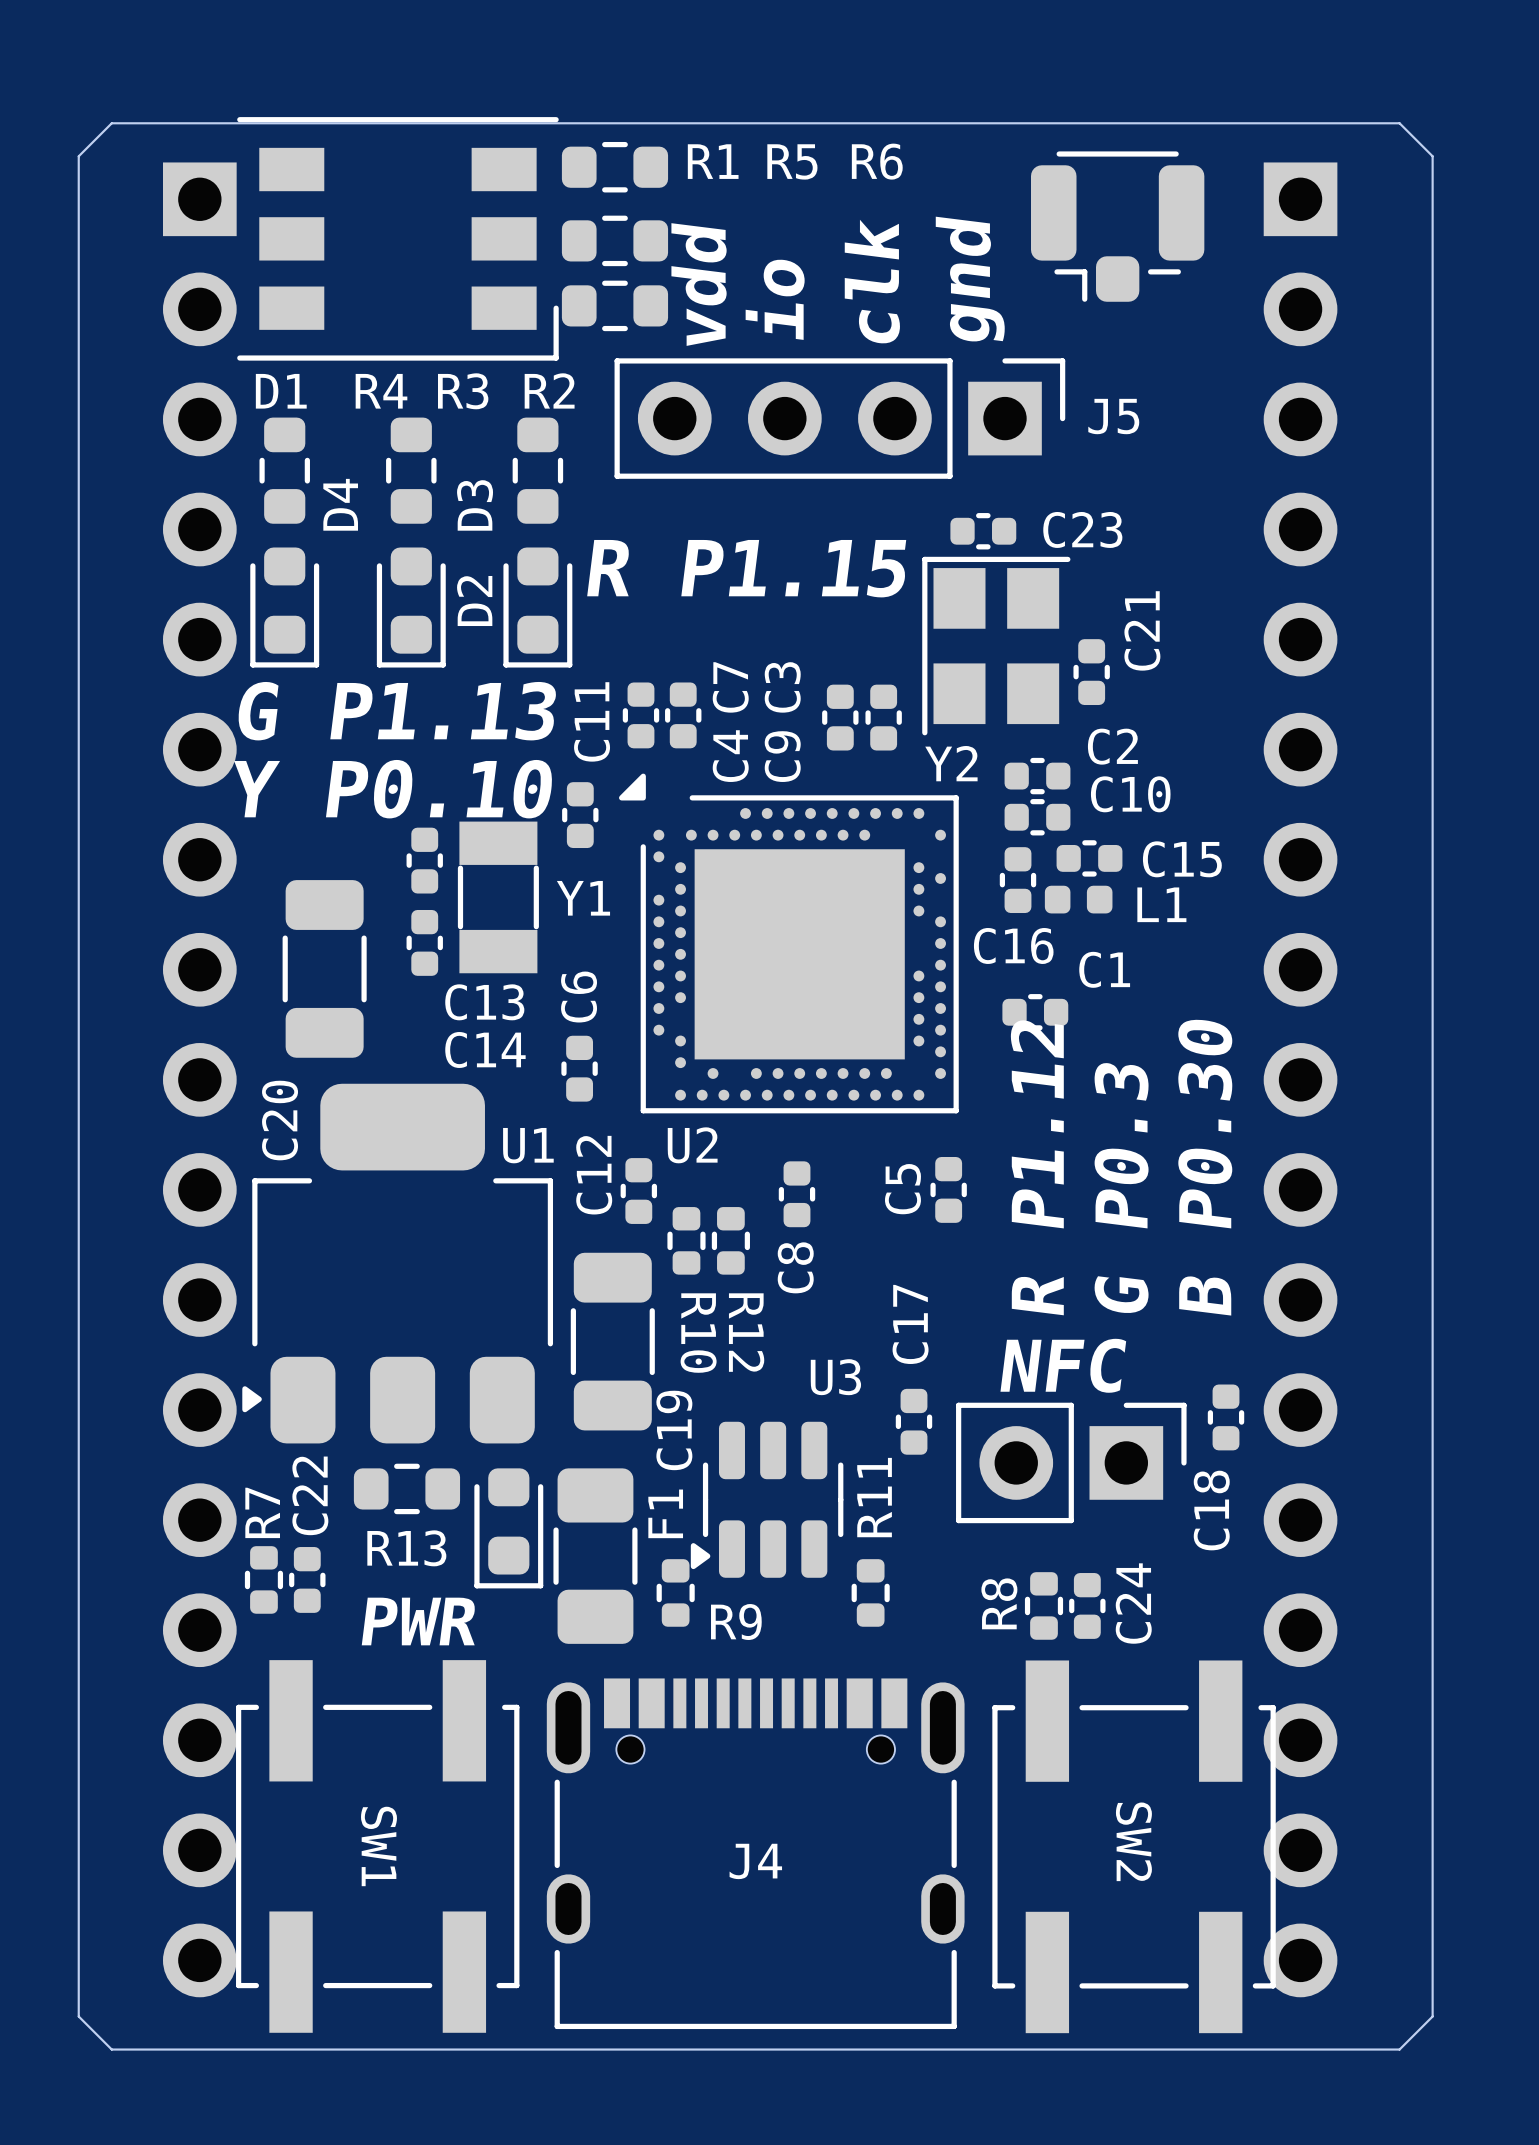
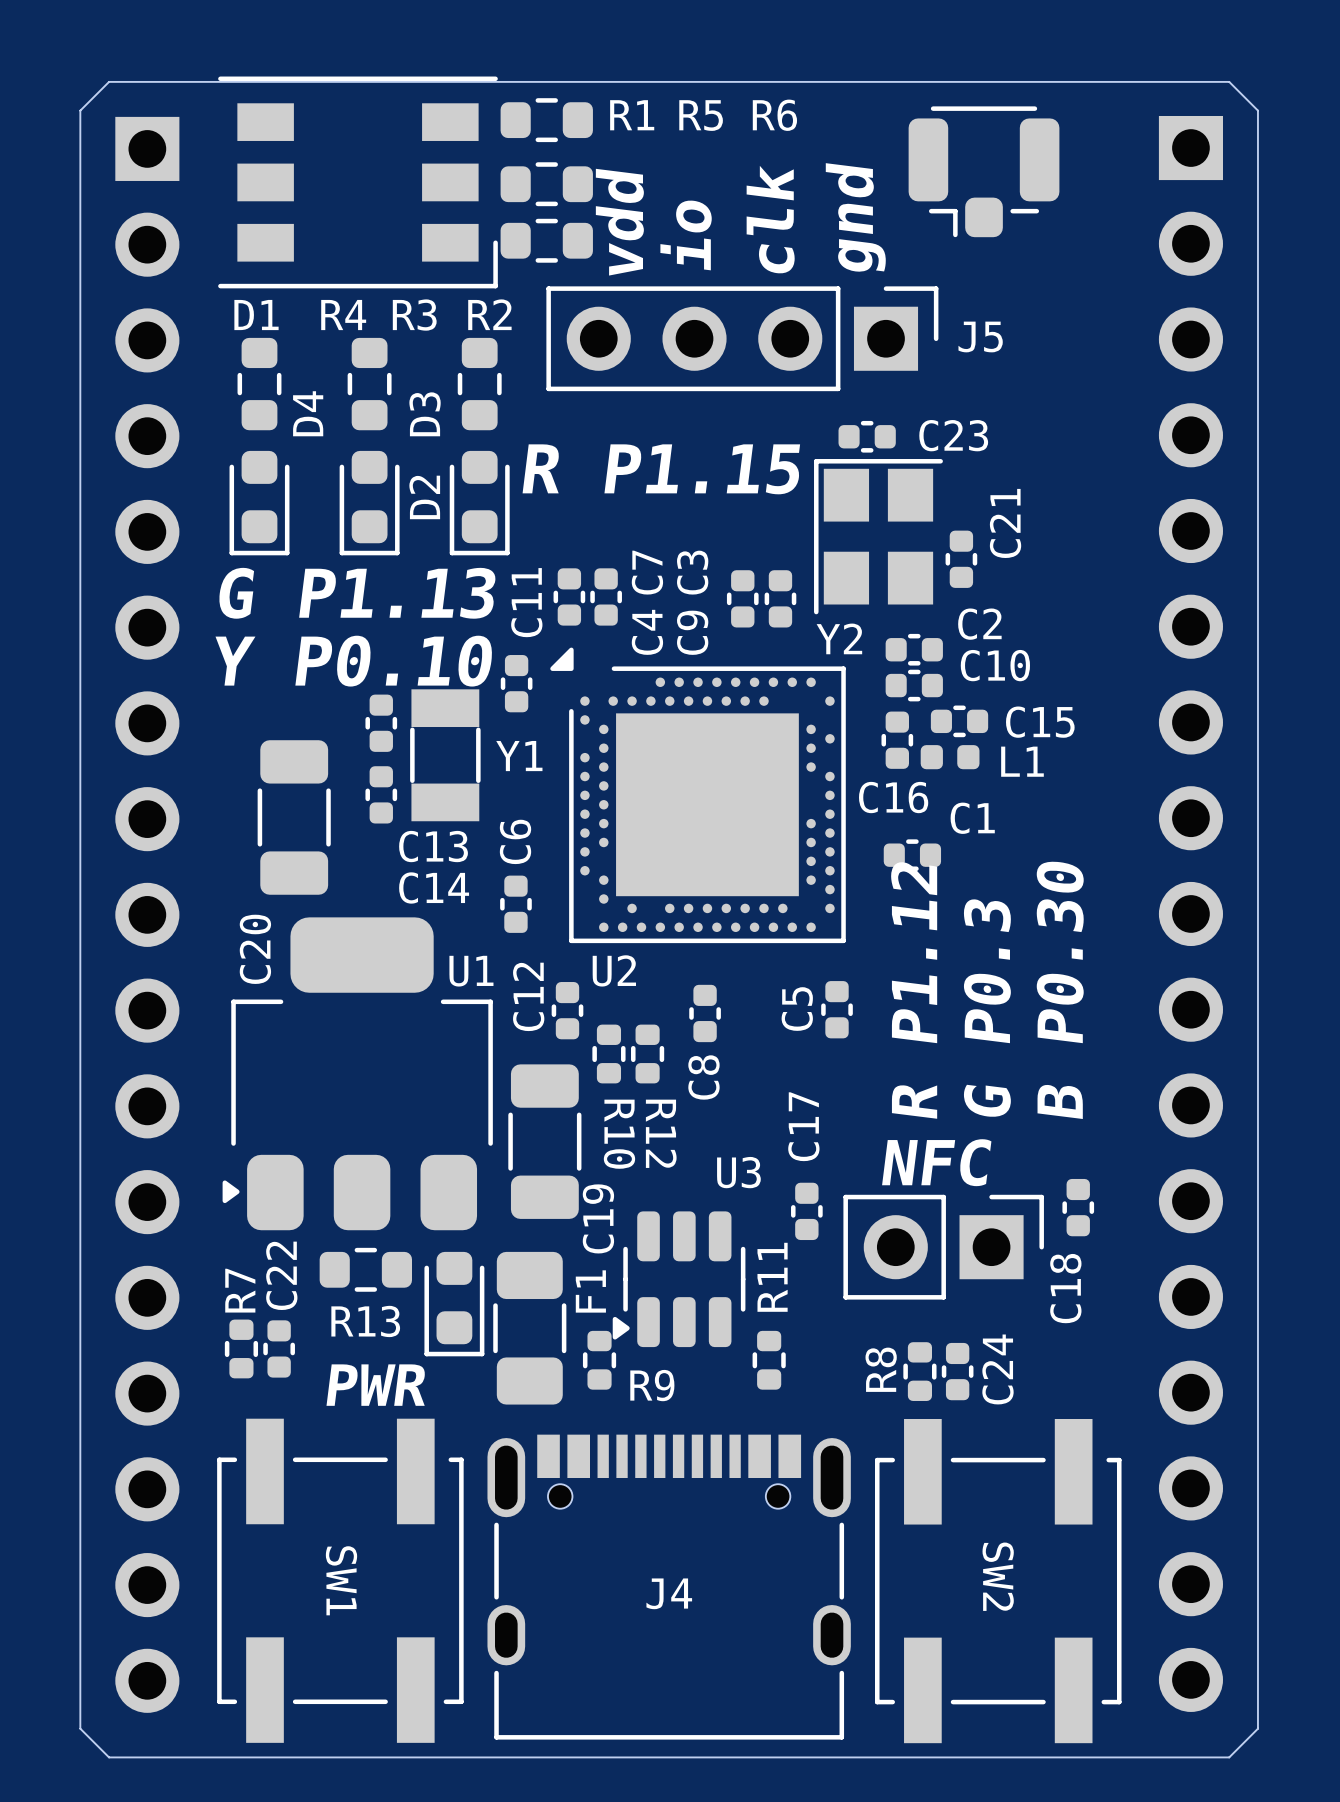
part position: (199, 1079) -> (147, 914)
part position: (1300, 1079) -> (1190, 913)

